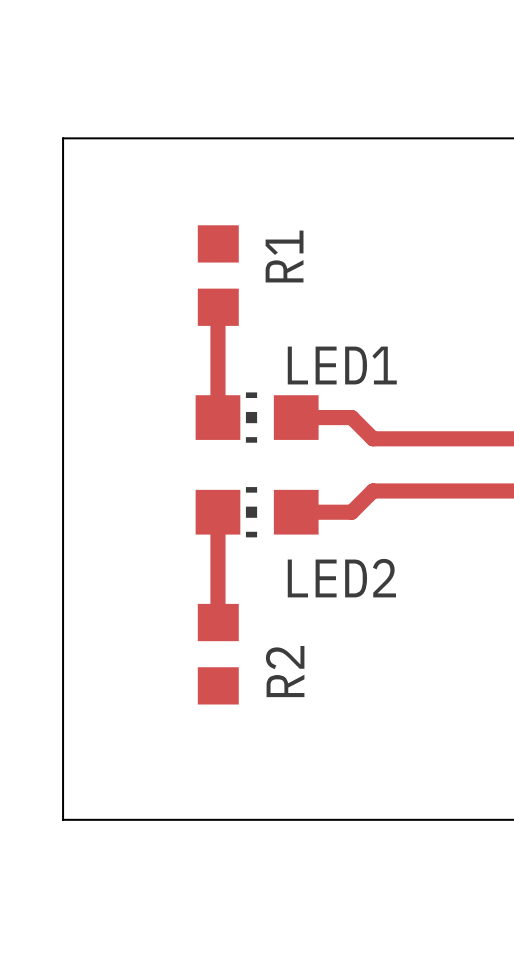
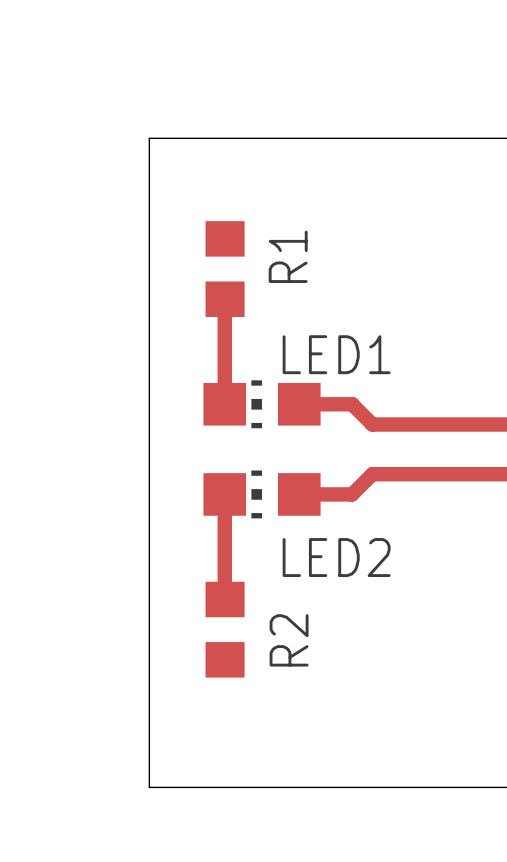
board edge: (138, 138) (63, 138) (63, 819) (138, 819) -> (149, 138) (149, 787)

